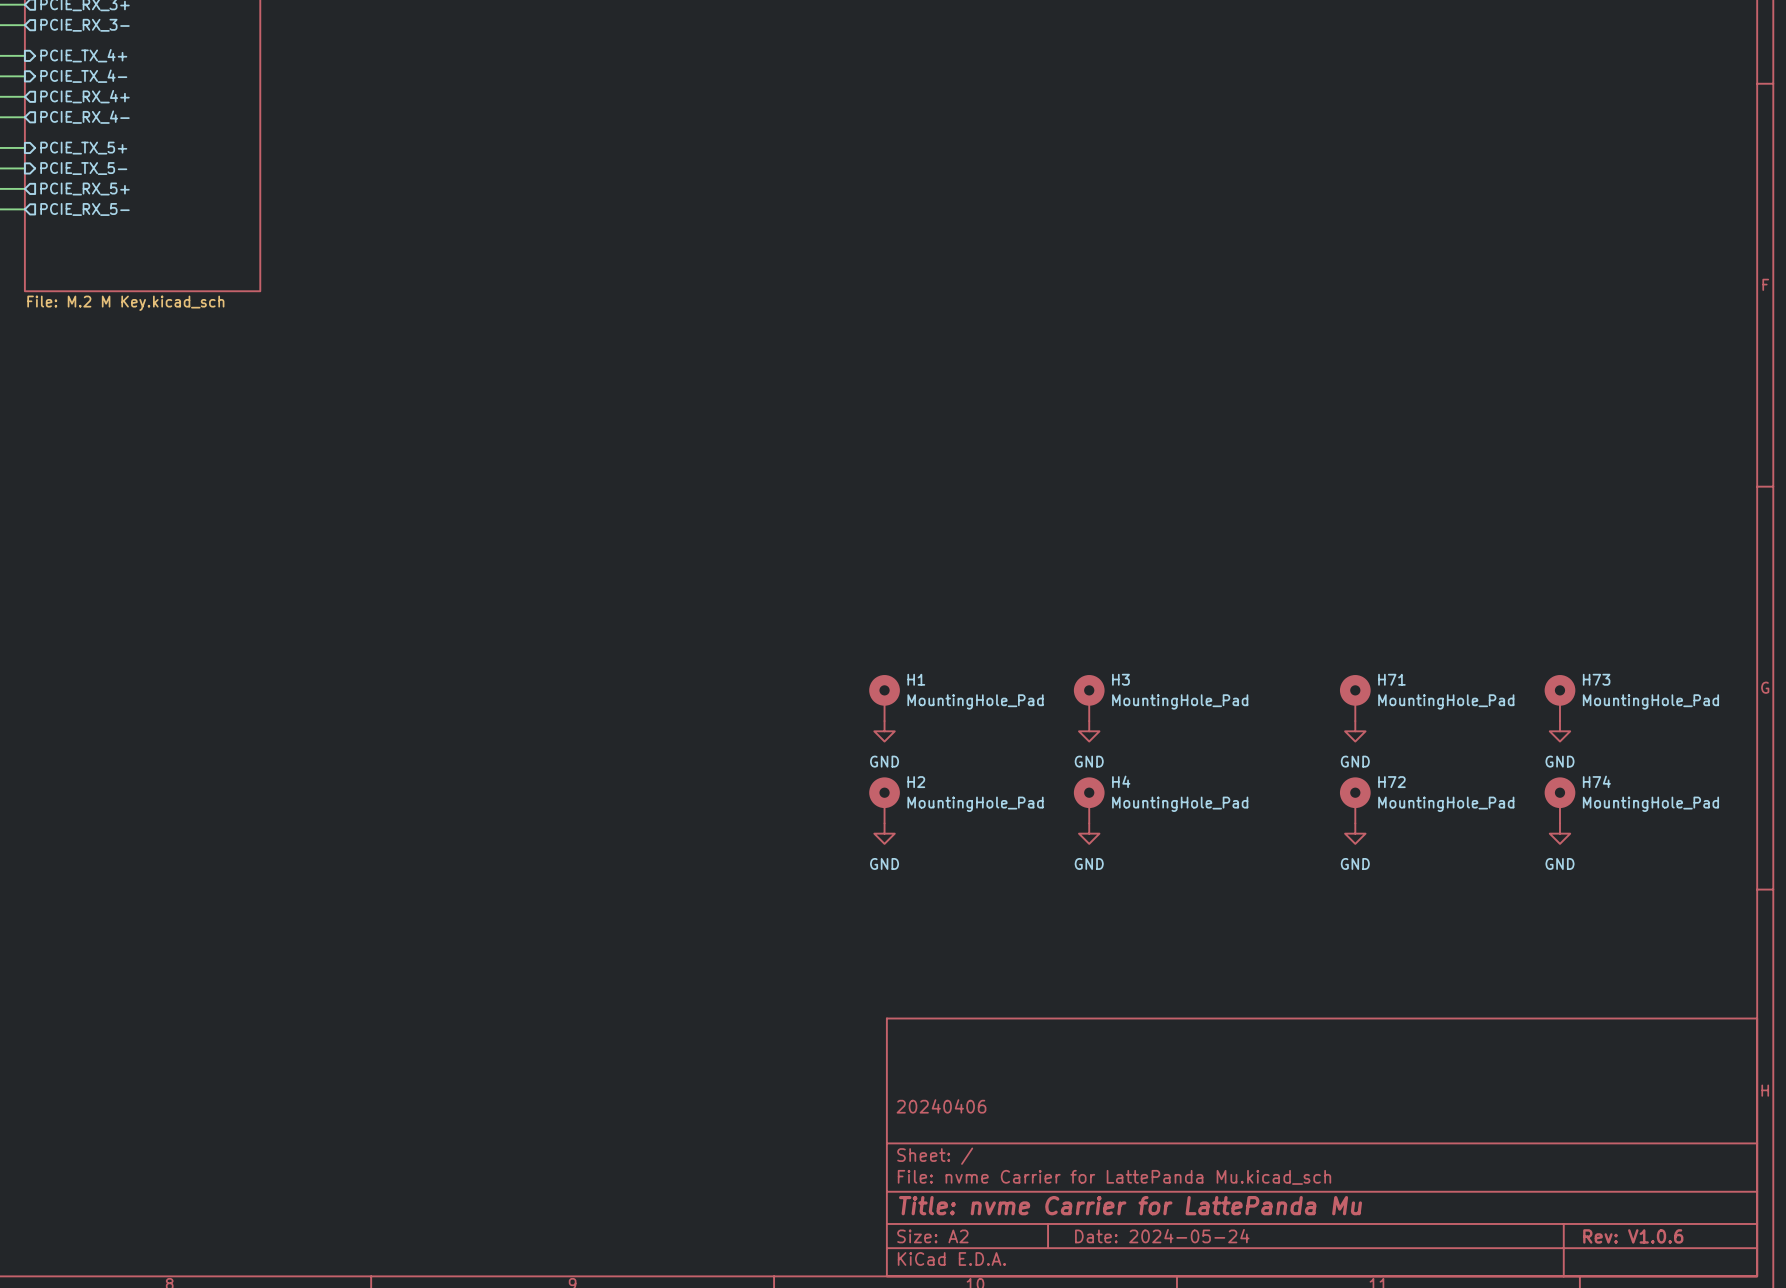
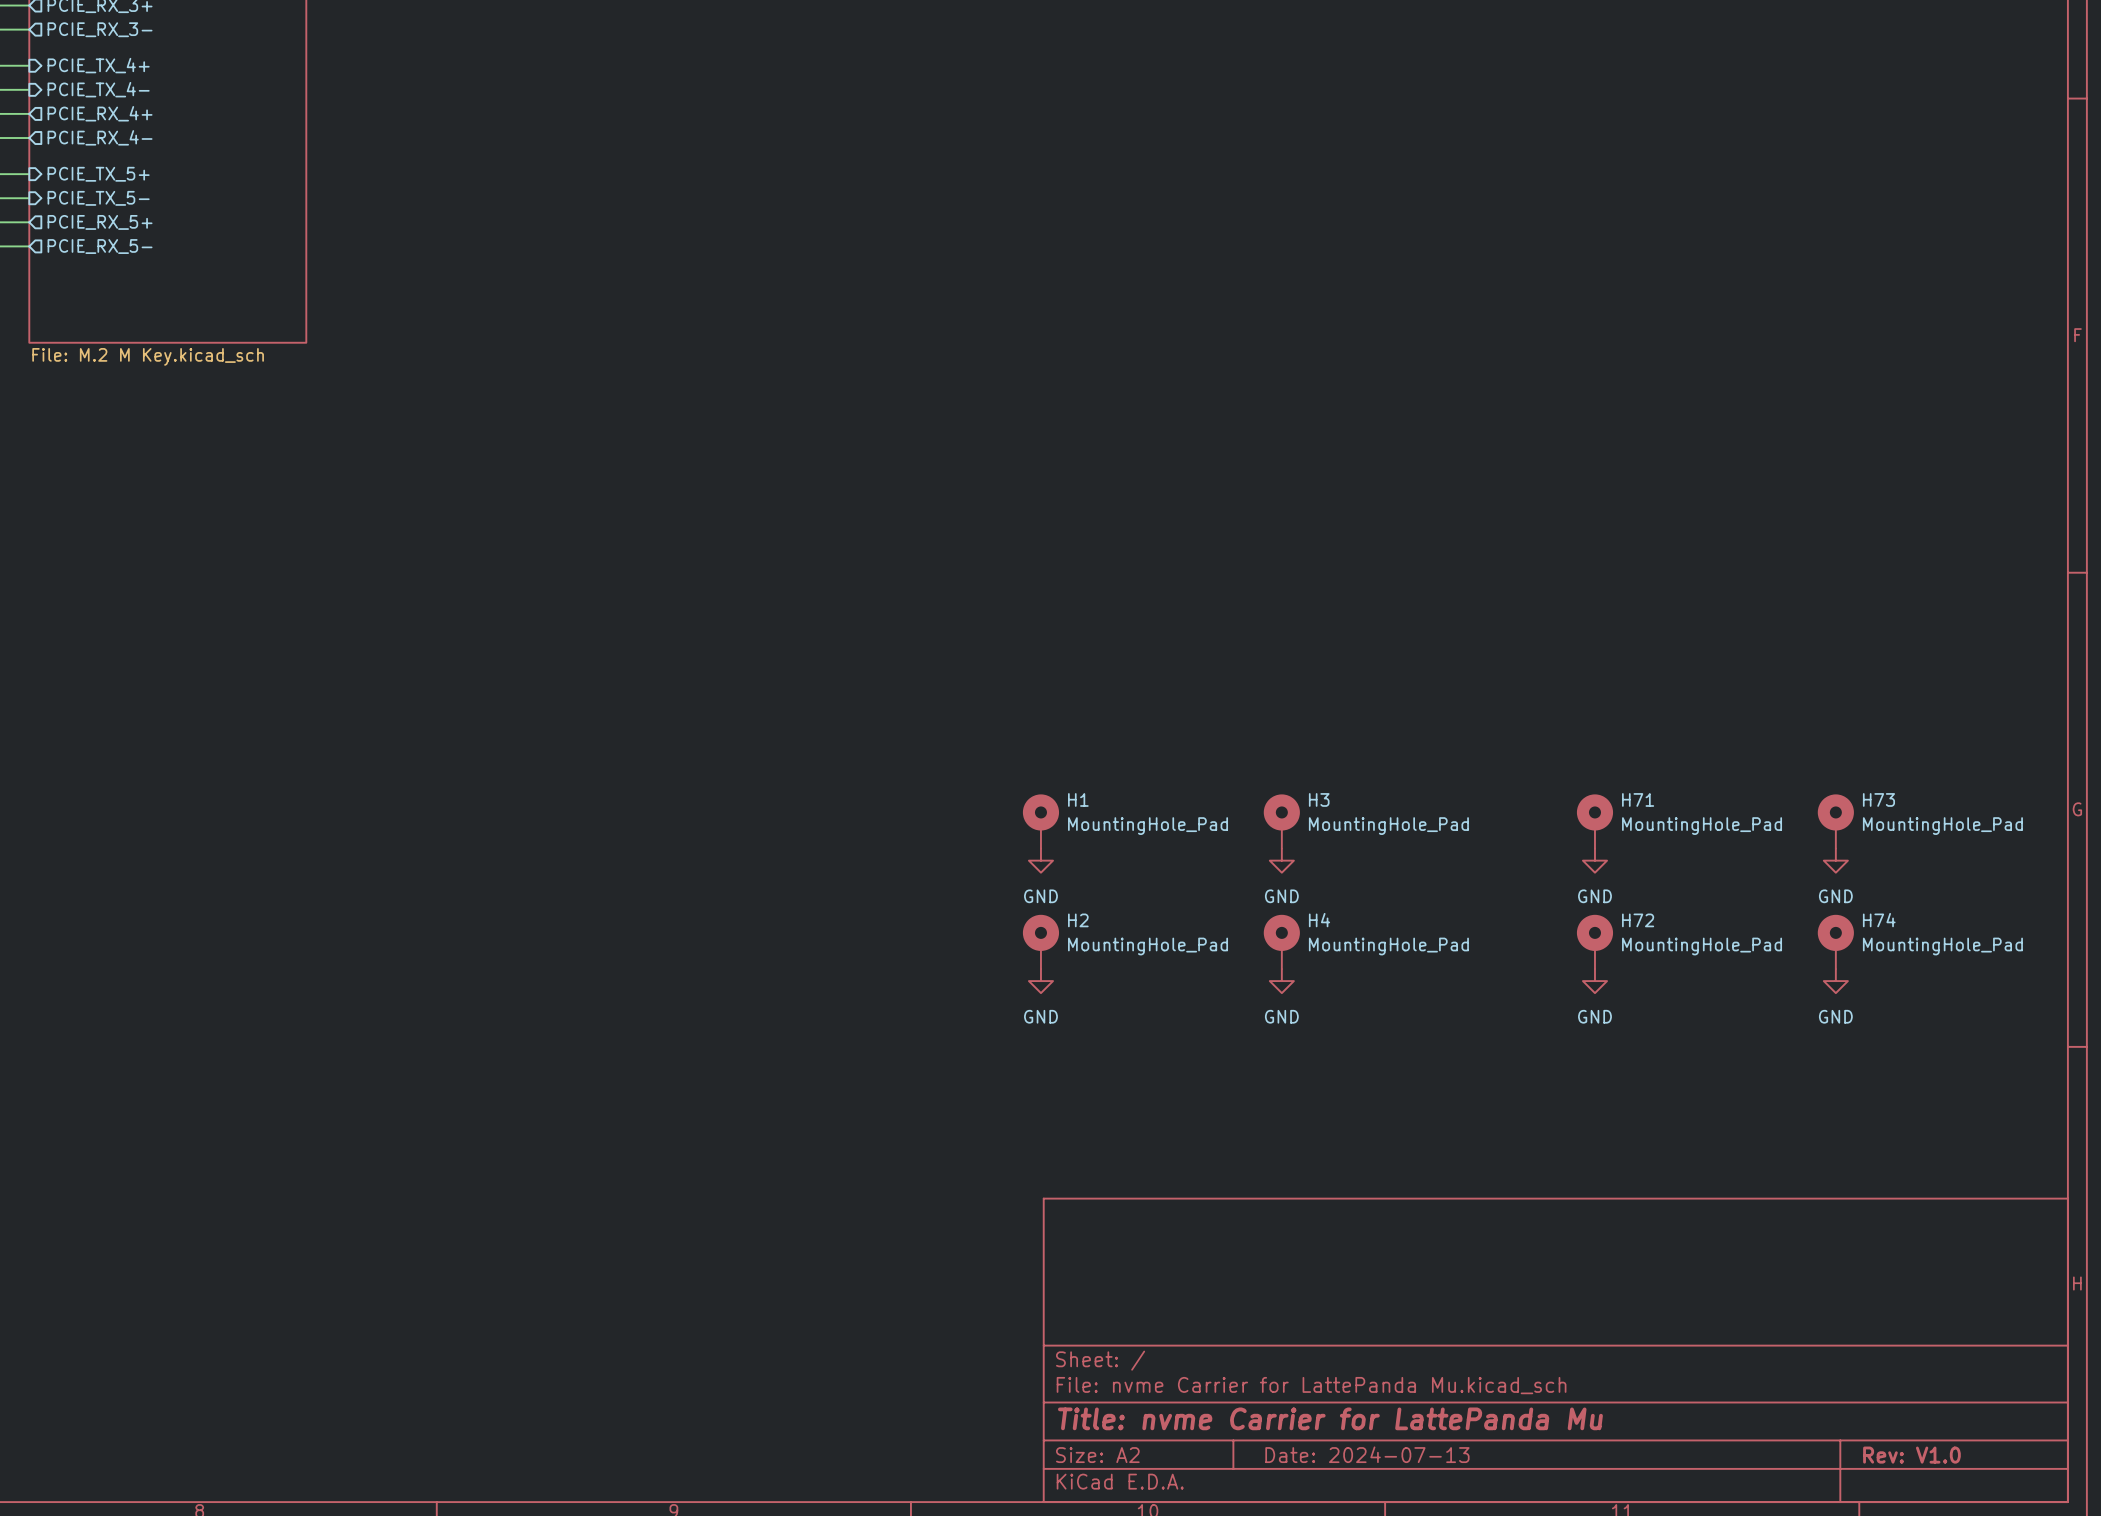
title block: 20240406 (941, 1106) -> none
title block: Date: 2024-05-24 (1162, 1236) -> Date: 2024-07-13 (1367, 1454)
title block: Rev: V1.0.6 (1633, 1236) -> Rev: V1.0 (1911, 1455)

